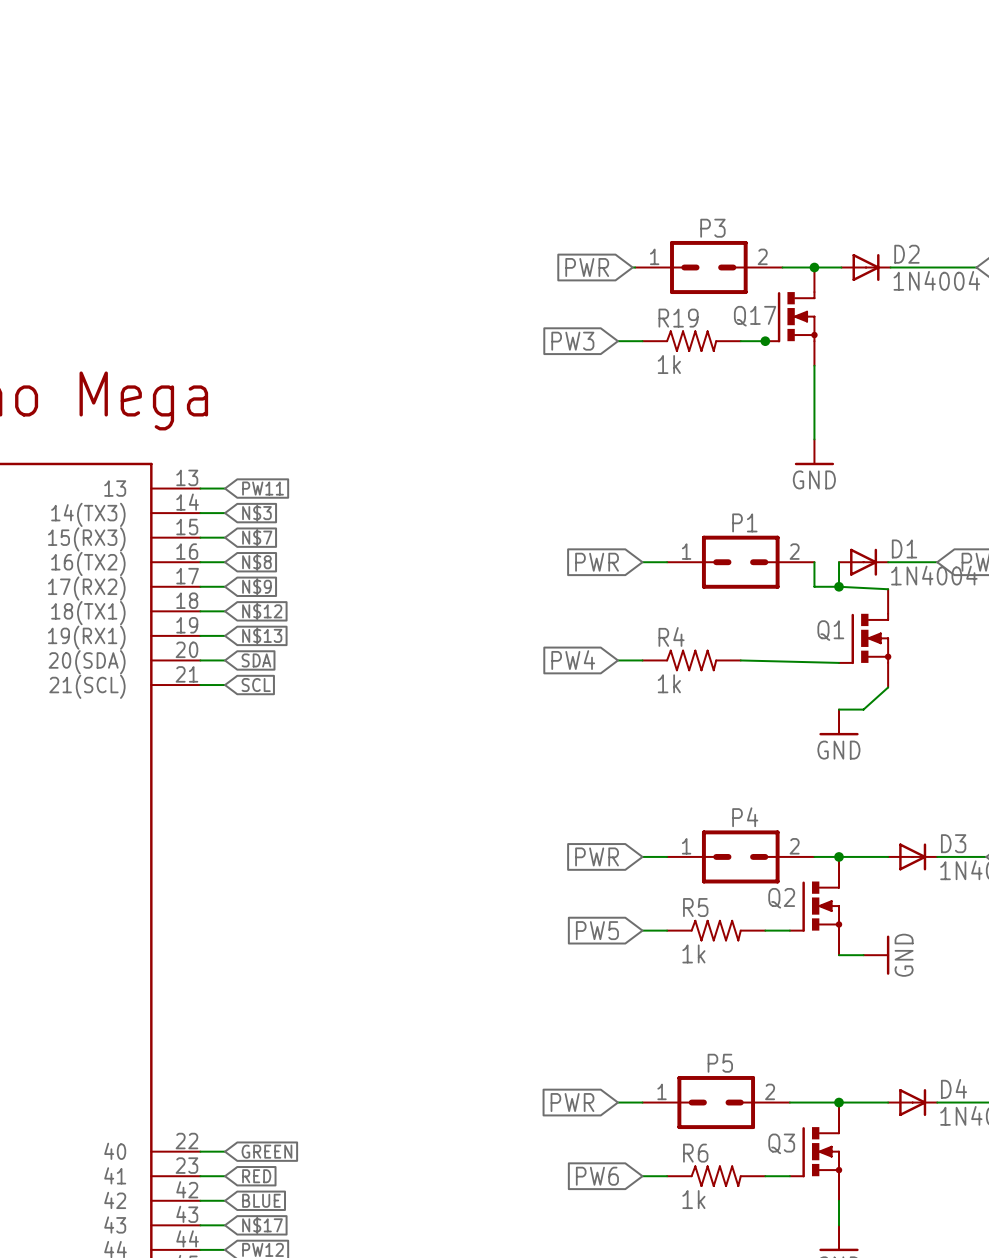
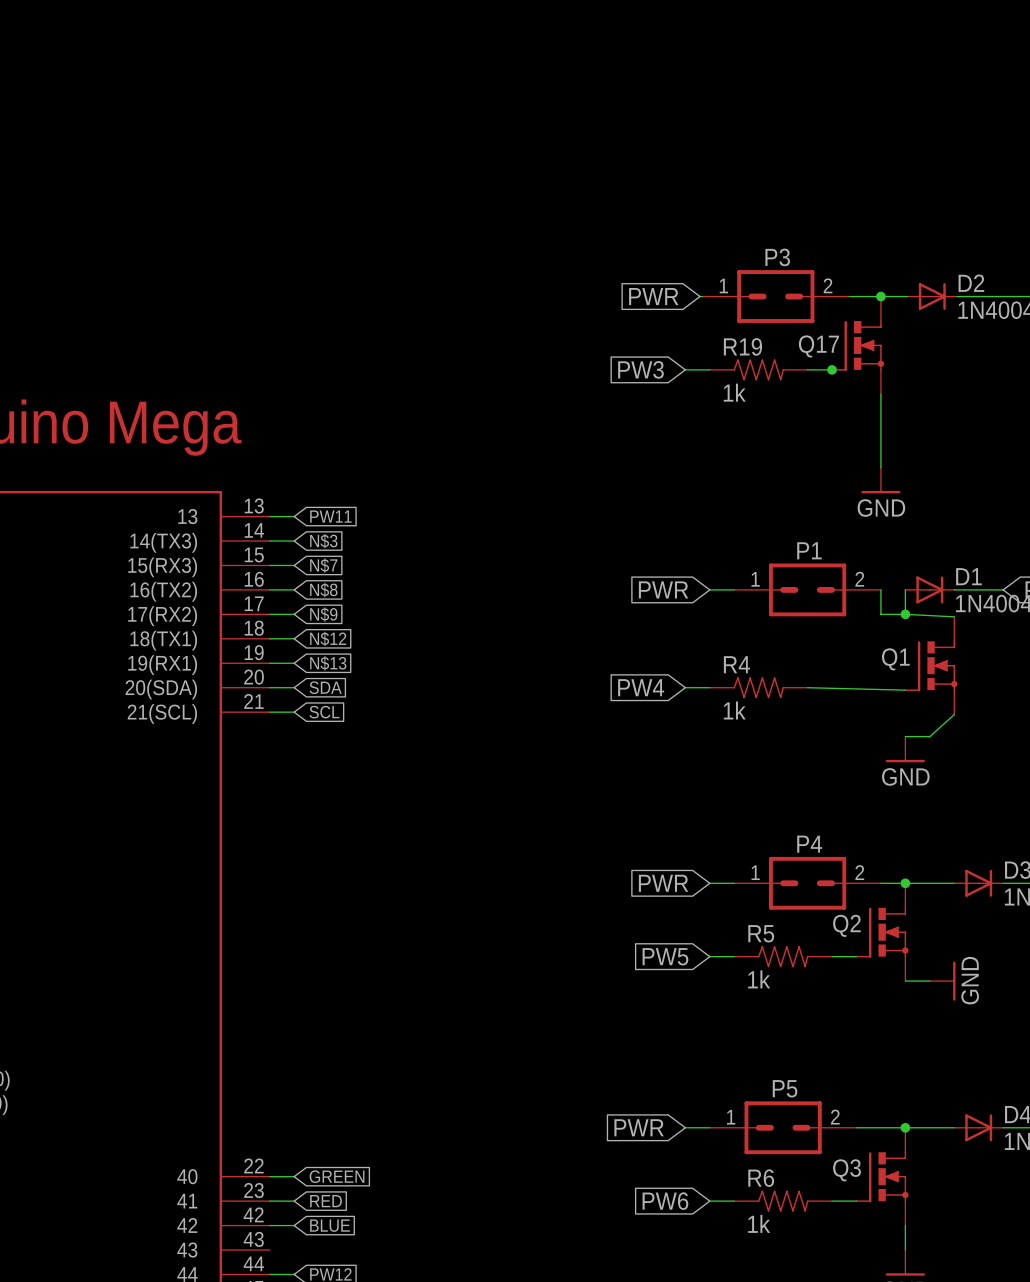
wire: (200, 1225) (225, 1225) -> none
global label: N$17 (262, 1225) -> none

